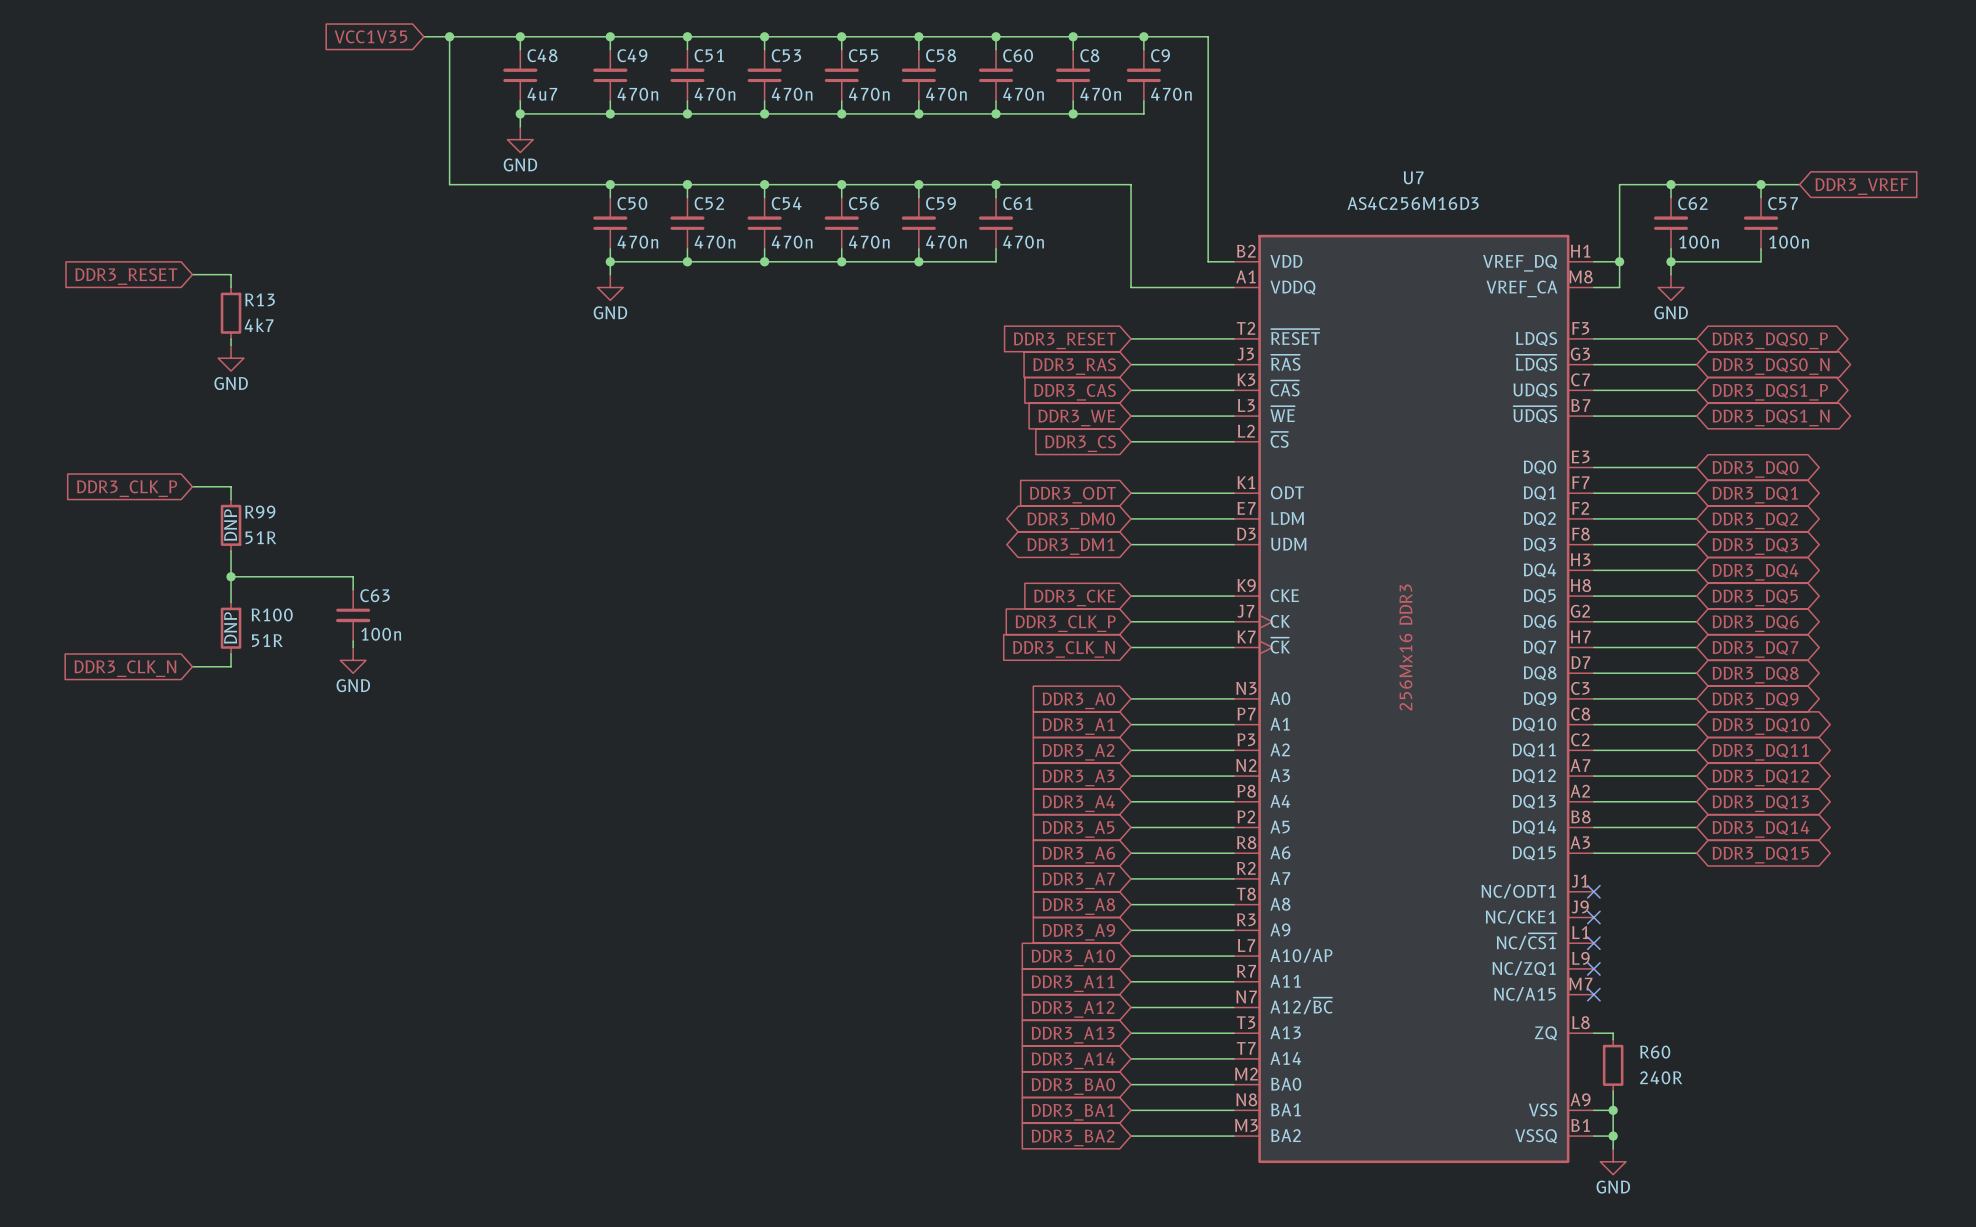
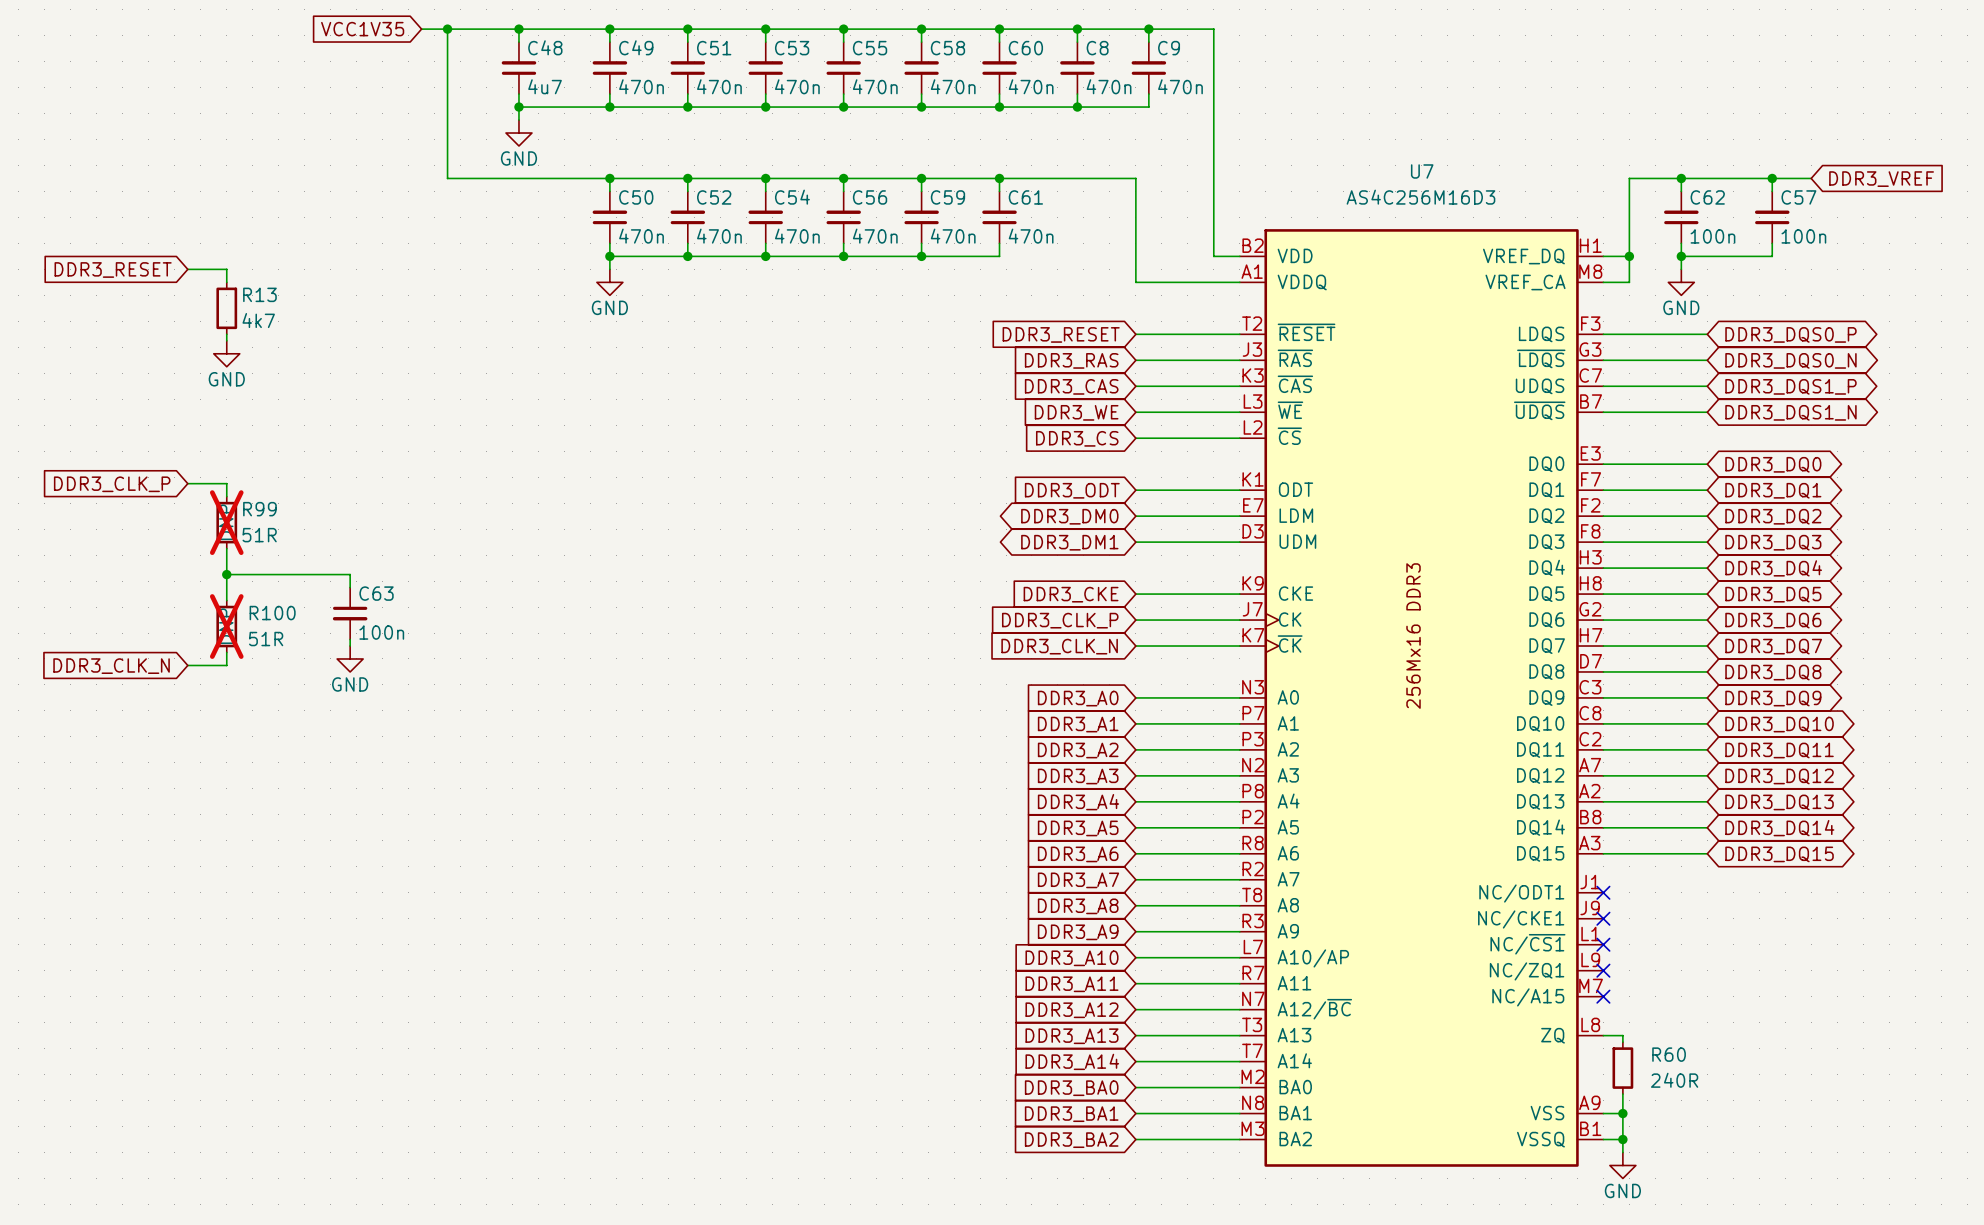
R99 do-not-place cross: none -> (226, 522)
R100 do-not-place cross: none -> (226, 626)

